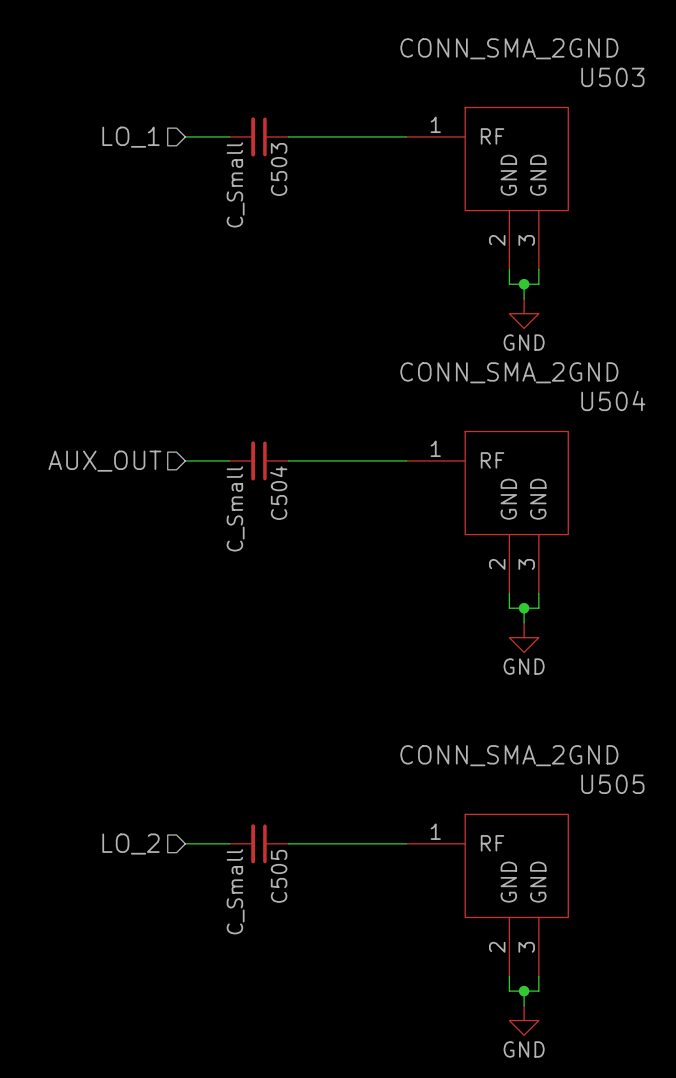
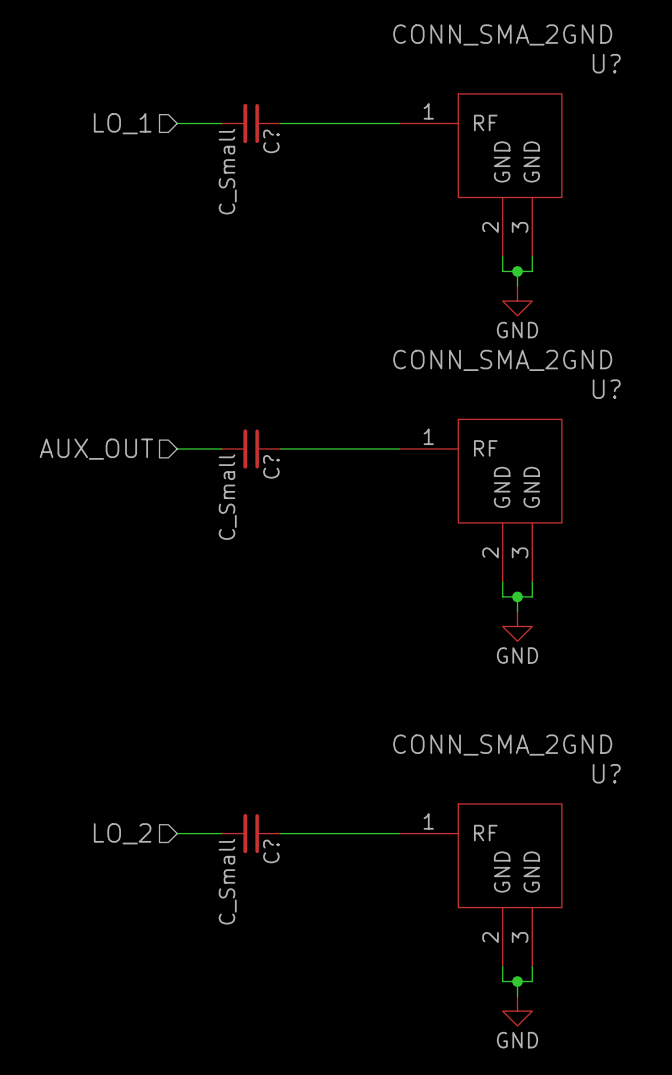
U503 name: U503 (612, 77) -> U? (606, 63)
C503 name: C503 (279, 169) -> C? (271, 141)
U504 name: U504 (613, 400) -> U? (606, 389)
C504 name: C504 (278, 493) -> C? (271, 466)
U505 name: U505 (612, 784) -> U? (606, 773)
C505 name: C505 (279, 876) -> C? (271, 851)

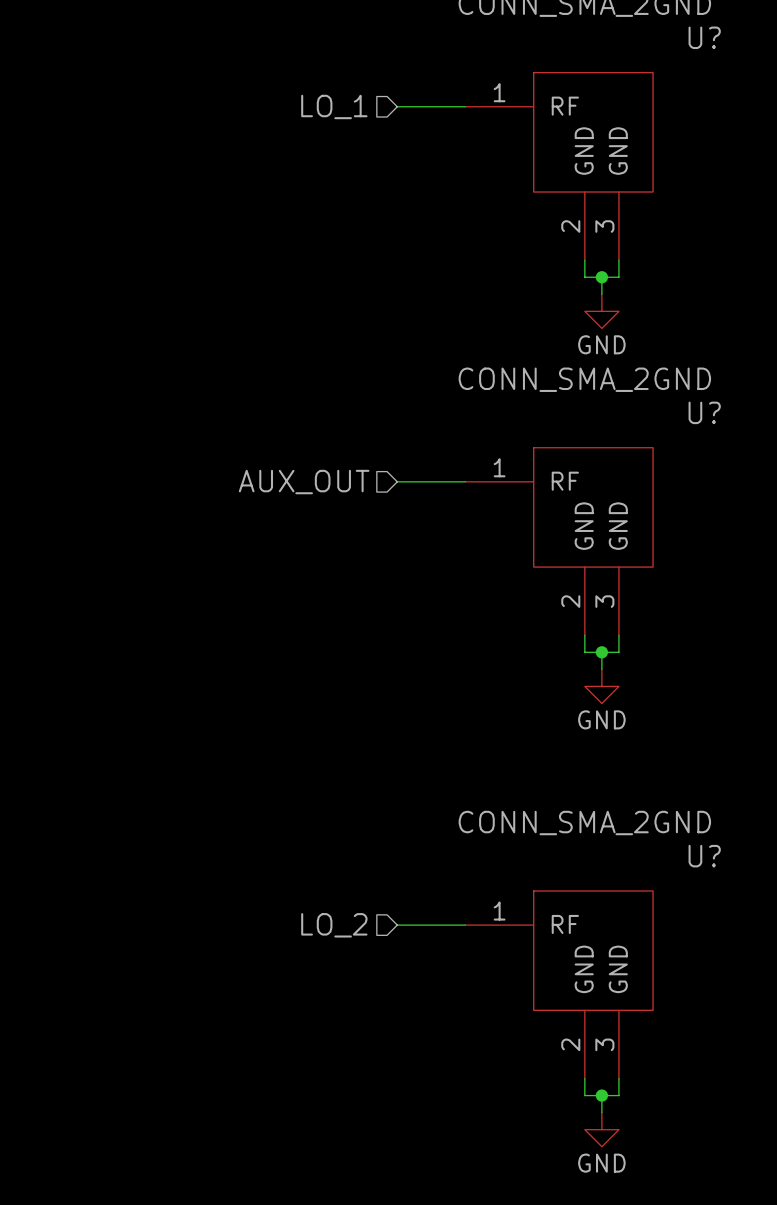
hierarchical label position: LO_1 (122, 123) -> LO_1 (334, 106)
wire: (177, 123) (221, 123) -> none
C?: C_Small (251, 123) -> none
wire: (280, 123) (339, 123) -> none
wire: (177, 448) (221, 448) -> none
C?: C_Small (251, 448) -> none
wire: (280, 448) (339, 448) -> none
hierarchical label position: AUX_OUT (96, 449) -> AUX_OUT (304, 482)
hierarchical label position: LO_2 (122, 833) -> LO_2 (334, 925)
wire: (177, 833) (221, 833) -> none
C?: C_Small (251, 833) -> none
wire: (280, 833) (339, 833) -> none

